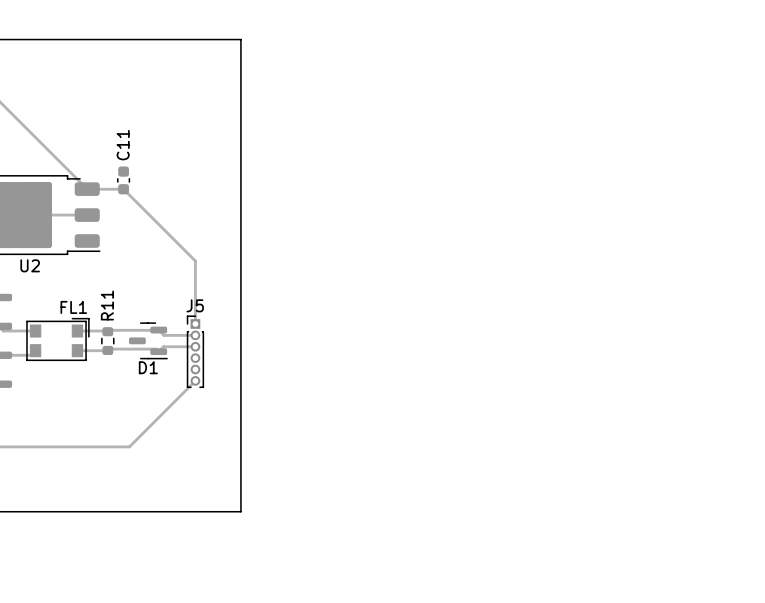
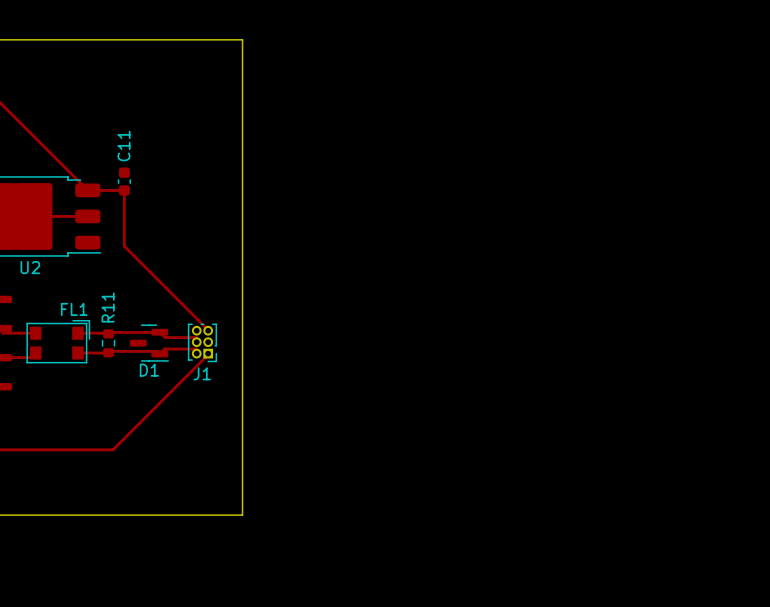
track: (123, 189) (195, 261) (195, 324) -> (124, 190) (124, 246) (208, 330)
J1: none -> (202, 342)
J5: (195, 351) -> none
track: (195, 380) (129, 446) (112, 446) -> (208, 353) (113, 449)

